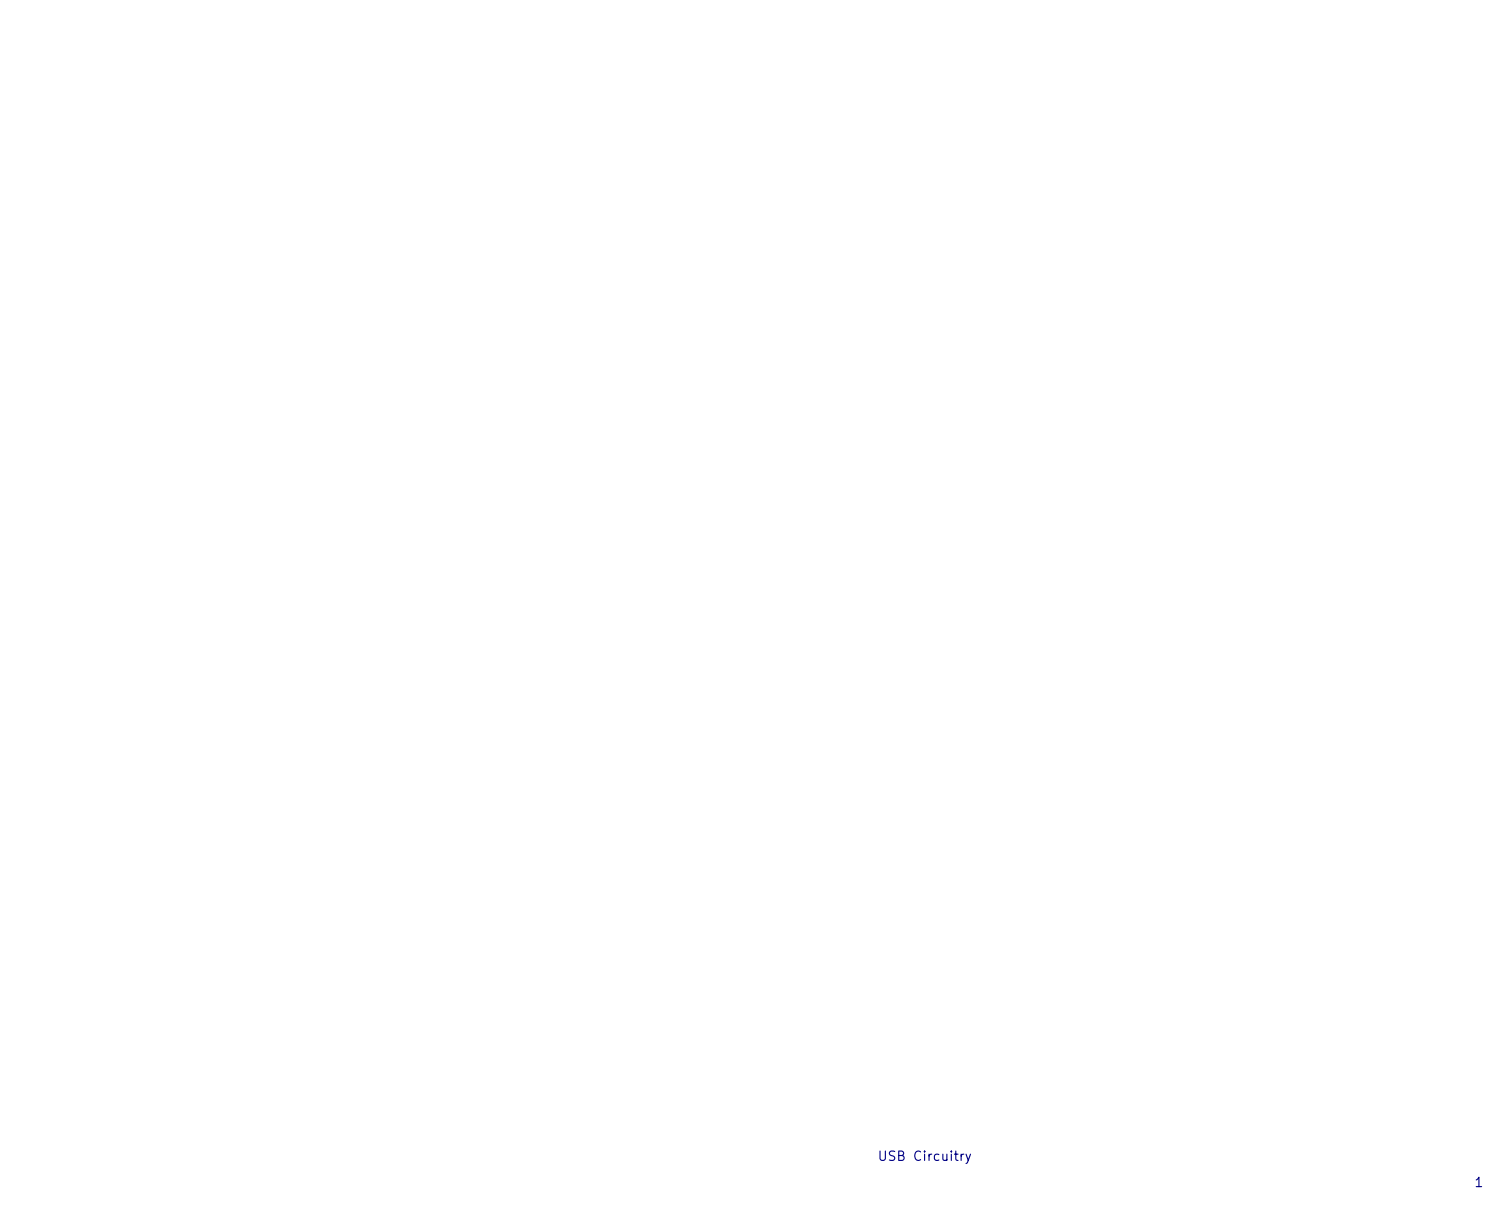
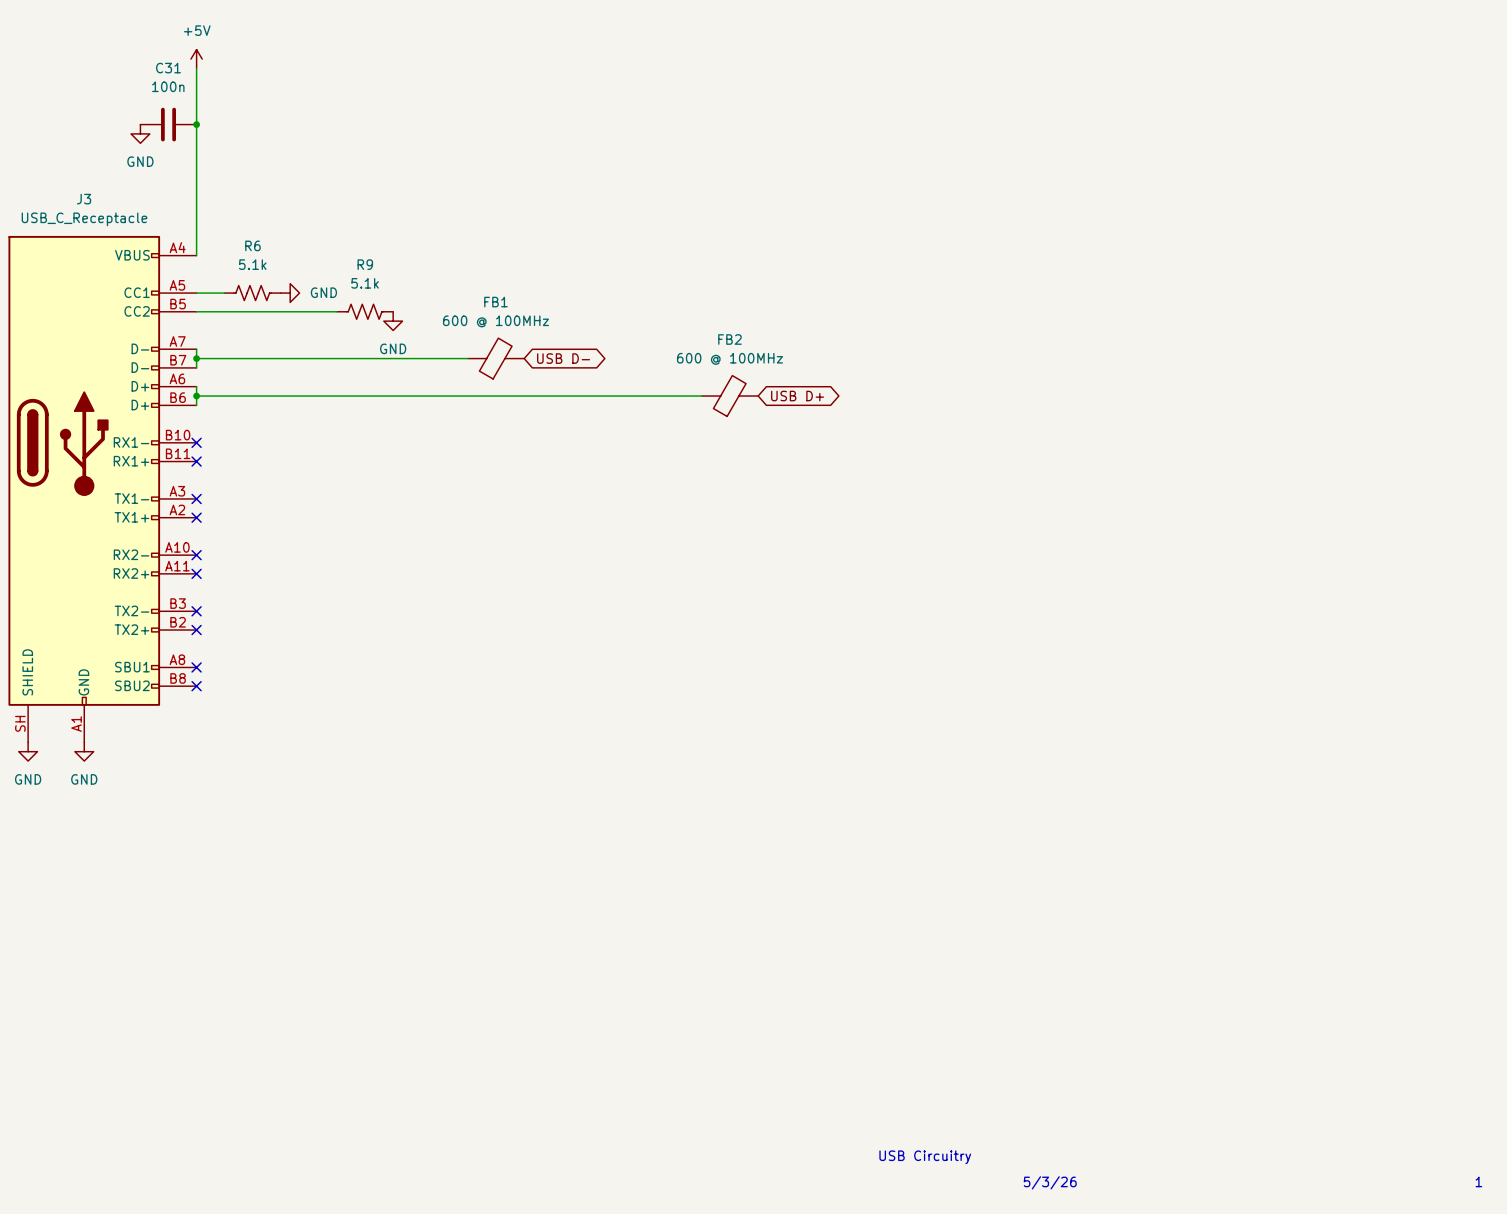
power symbol: none -> +5V (196, 59)
wire: none -> (196, 68) (196, 255)
C31: none -> 100n (168, 124)
junction: none -> (196, 124)
power symbol: none -> GND (140, 133)
wire: none -> (196, 293) (224, 293)
R6: none -> 5.1k (252, 293)
power symbol: none -> GND (290, 293)
wire: none -> (196, 311) (336, 311)
R9: none -> 5.1k (365, 311)
power symbol: none -> GND (393, 321)
wire: none -> (196, 349) (196, 367)
wire: none -> (196, 358) (468, 358)
junction: none -> (196, 358)
FB1: none -> 600 @ 100MHz (496, 358)
global label: none -> USB D- (563, 358)
wire: none -> (196, 386) (196, 405)
wire: none -> (196, 396) (702, 396)
junction: none -> (196, 396)
FB2: none -> 600 @ 100MHz (730, 396)
global label: none -> USB D+ (797, 396)
no-connect mark: none -> (196, 442)
no-connect mark: none -> (196, 461)
J3: none -> USB_C_Receptacle (102, 489)
no-connect mark: none -> (196, 498)
no-connect mark: none -> (196, 517)
no-connect mark: none -> (196, 555)
no-connect mark: none -> (196, 573)
no-connect mark: none -> (196, 611)
no-connect mark: none -> (196, 630)
no-connect mark: none -> (196, 667)
no-connect mark: none -> (196, 686)
power symbol: none -> GND (28, 751)
power symbol: none -> GND (84, 751)
text: none -> 5/3/26 (1050, 1182)

